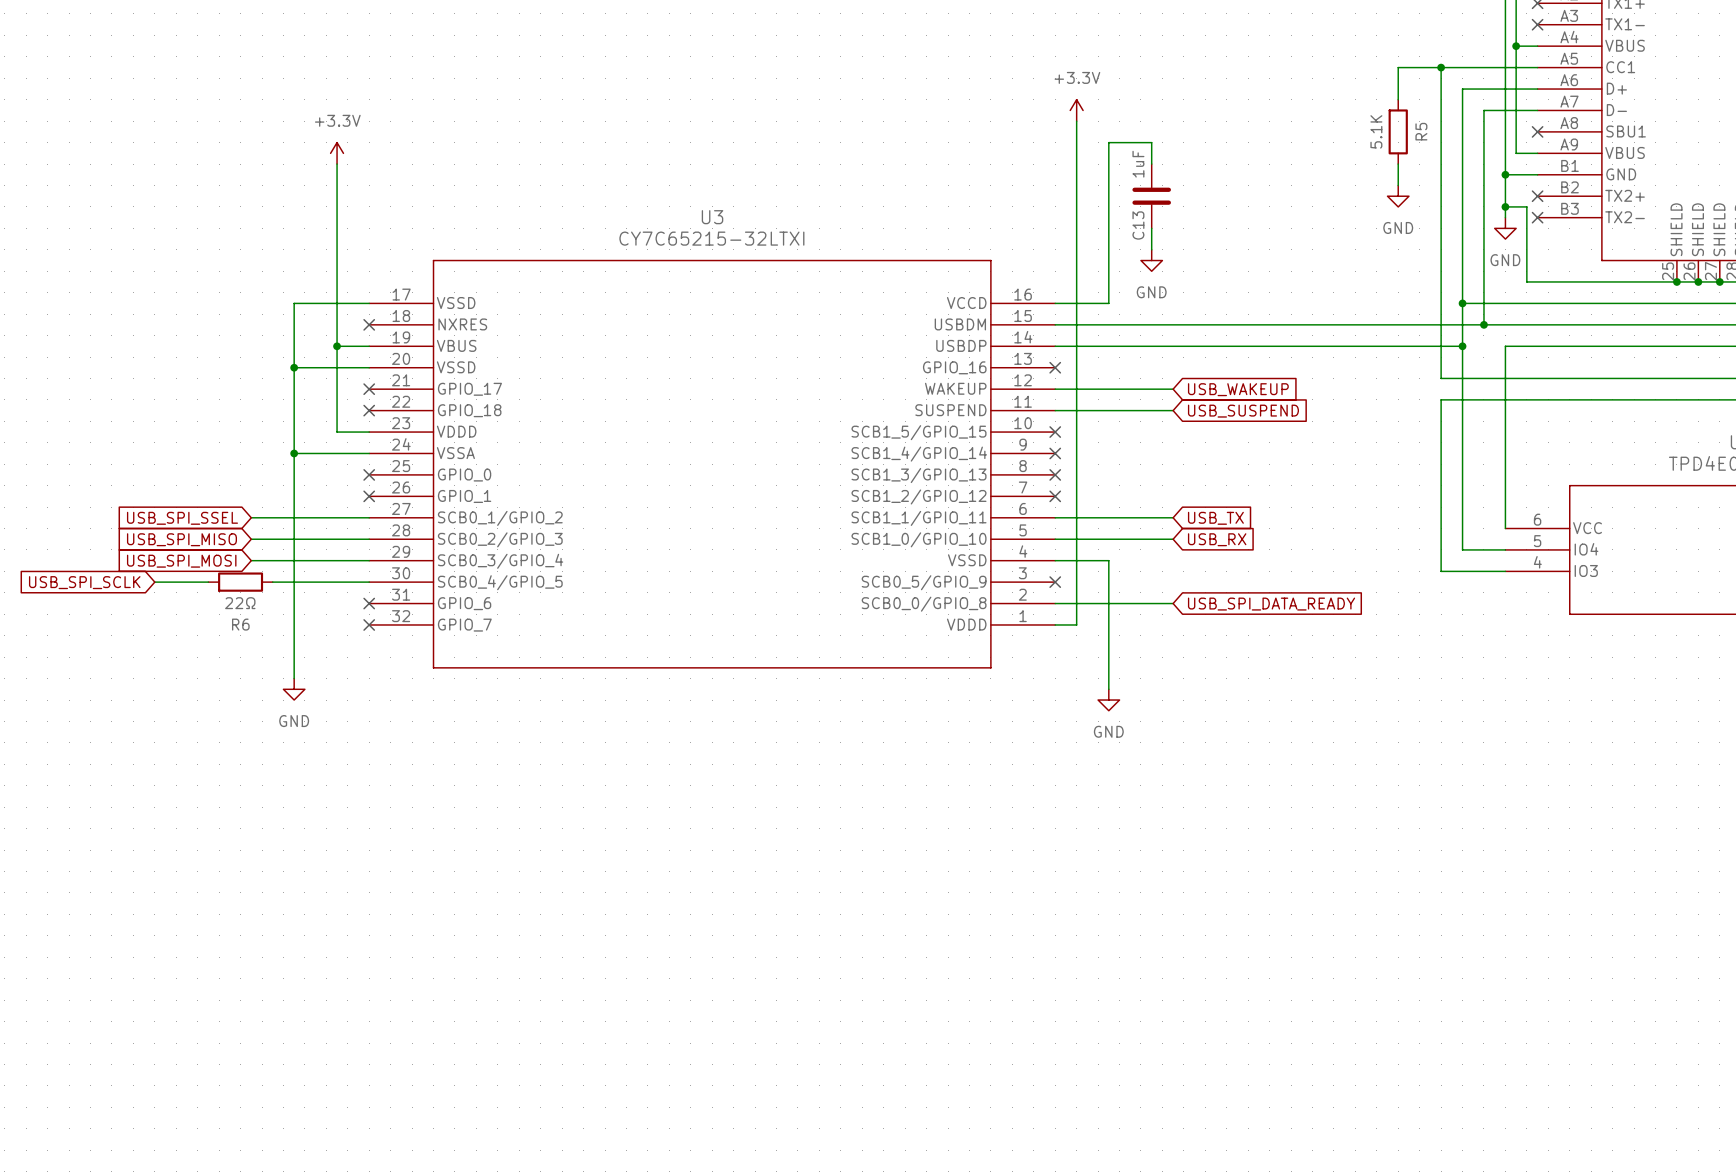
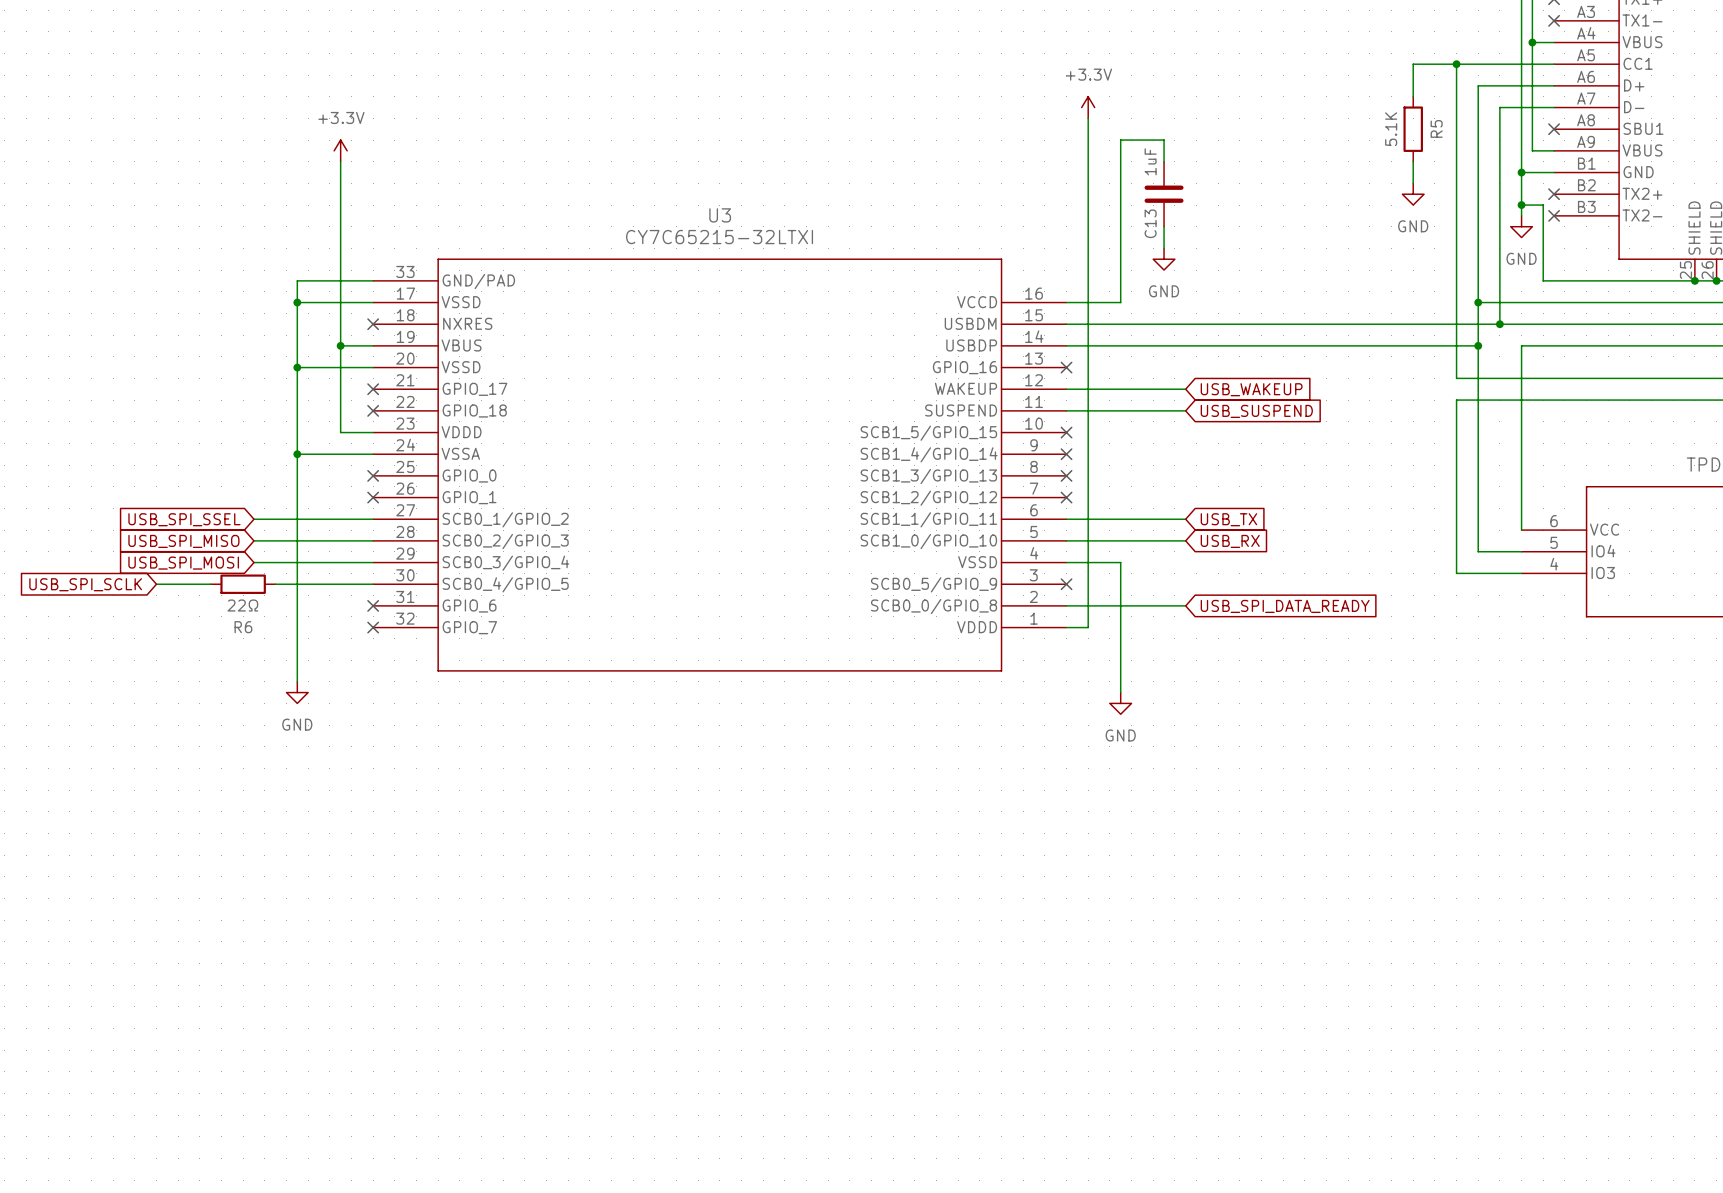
U3 symbol: [369, 260, 1056, 669] -> [373, 258, 1067, 672]
wire: none -> (373, 280) (297, 280) (297, 302)
junction: none -> (297, 302)

